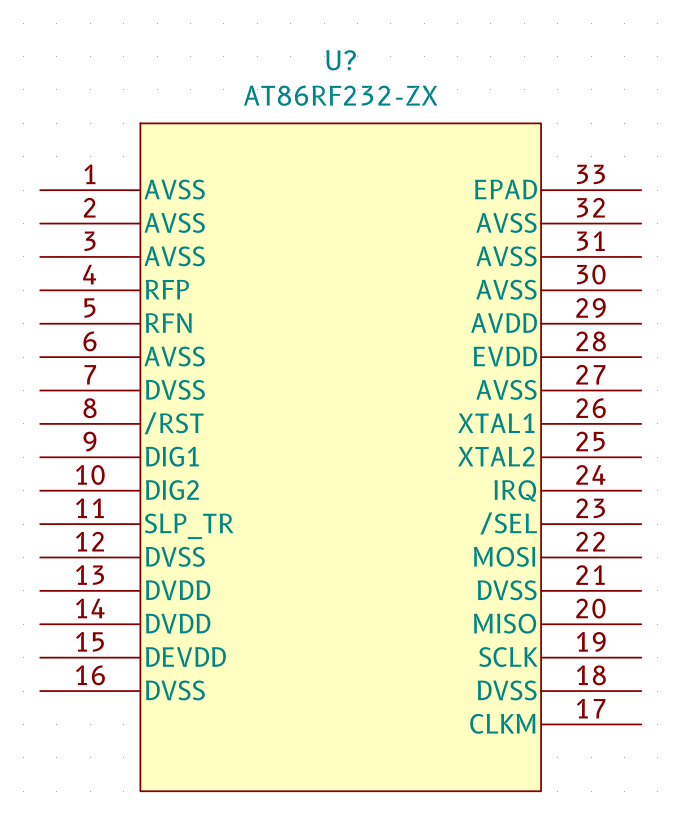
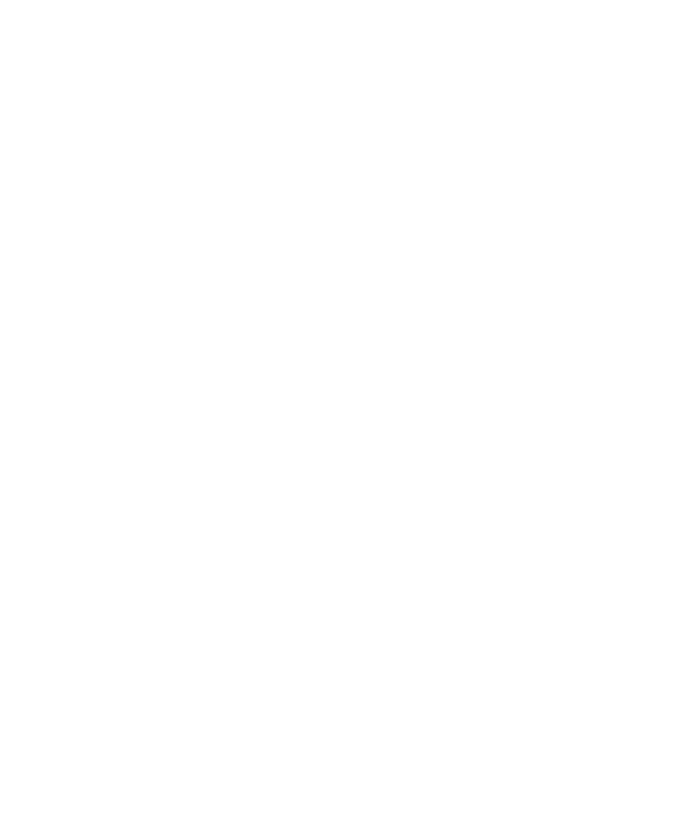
U?: AT86RF232-ZX (340, 457) -> none

